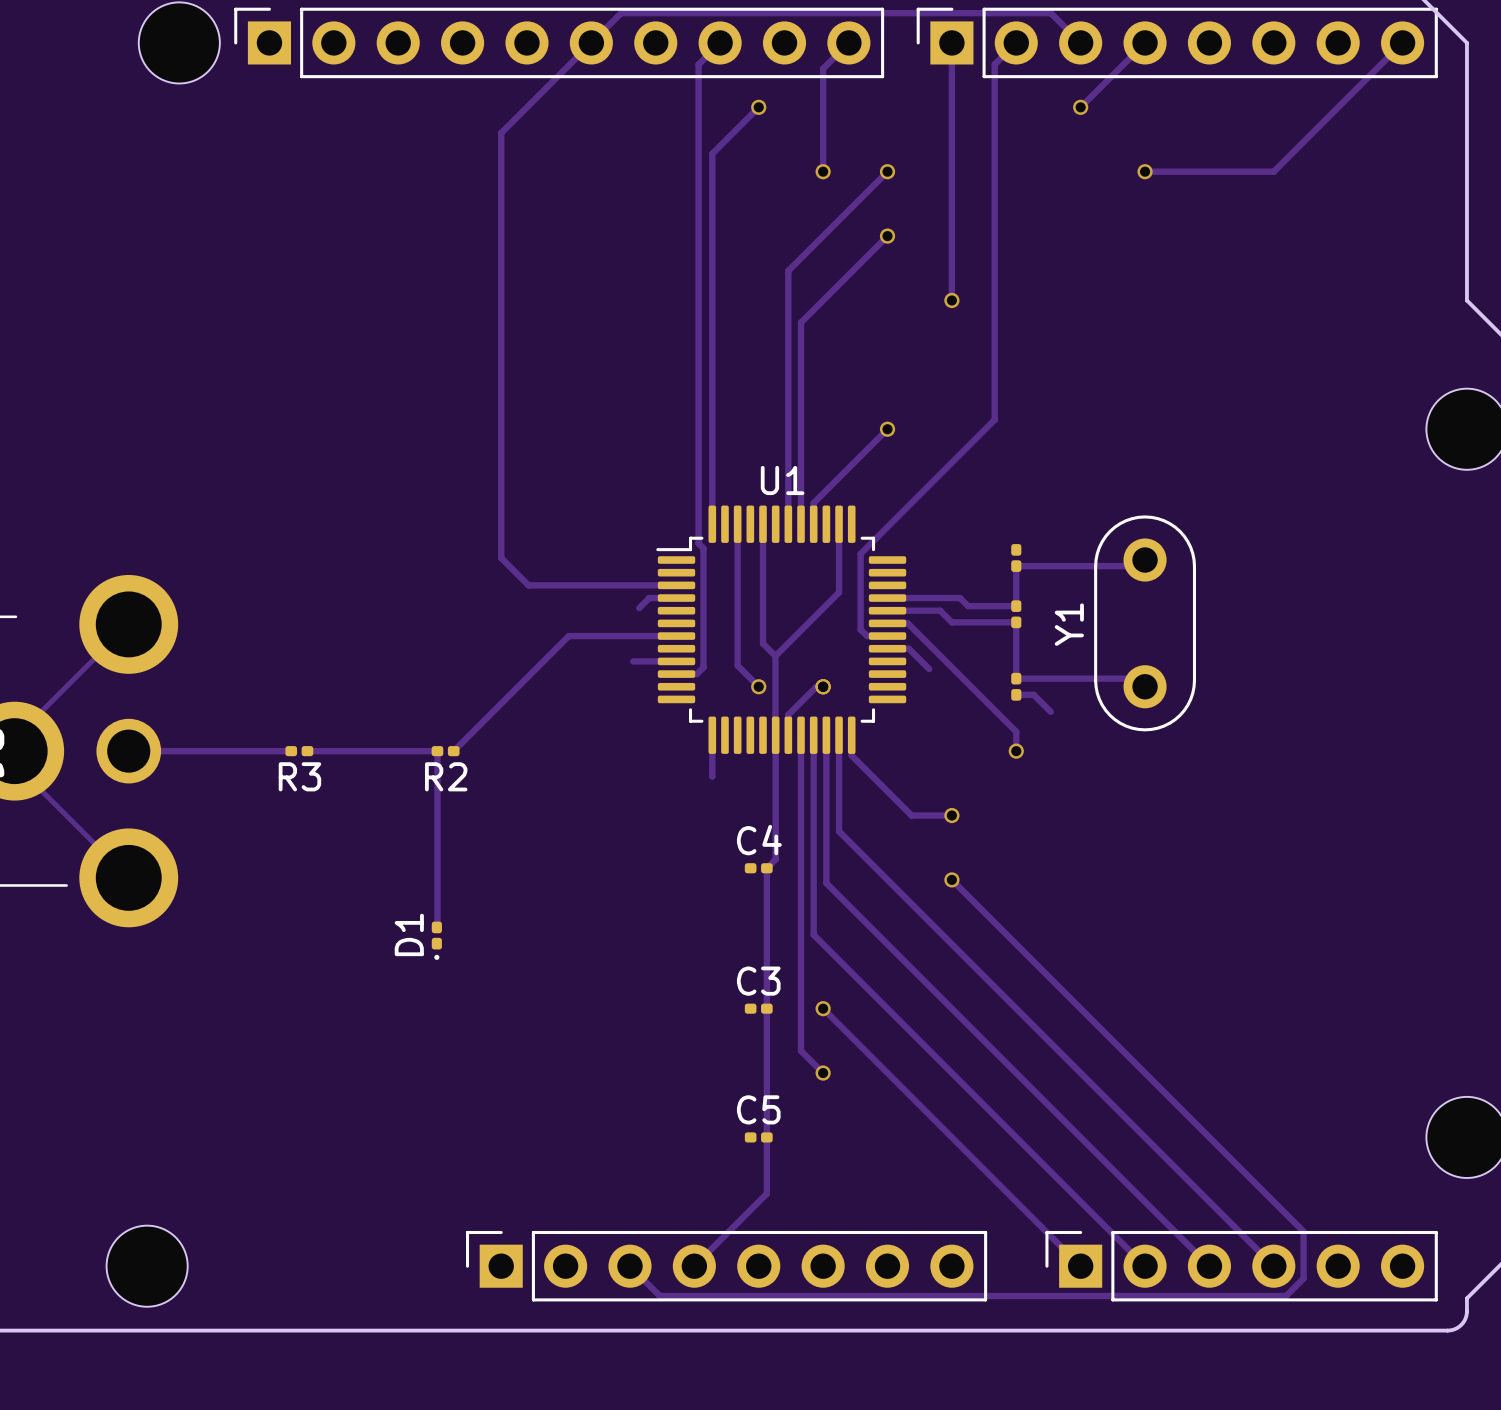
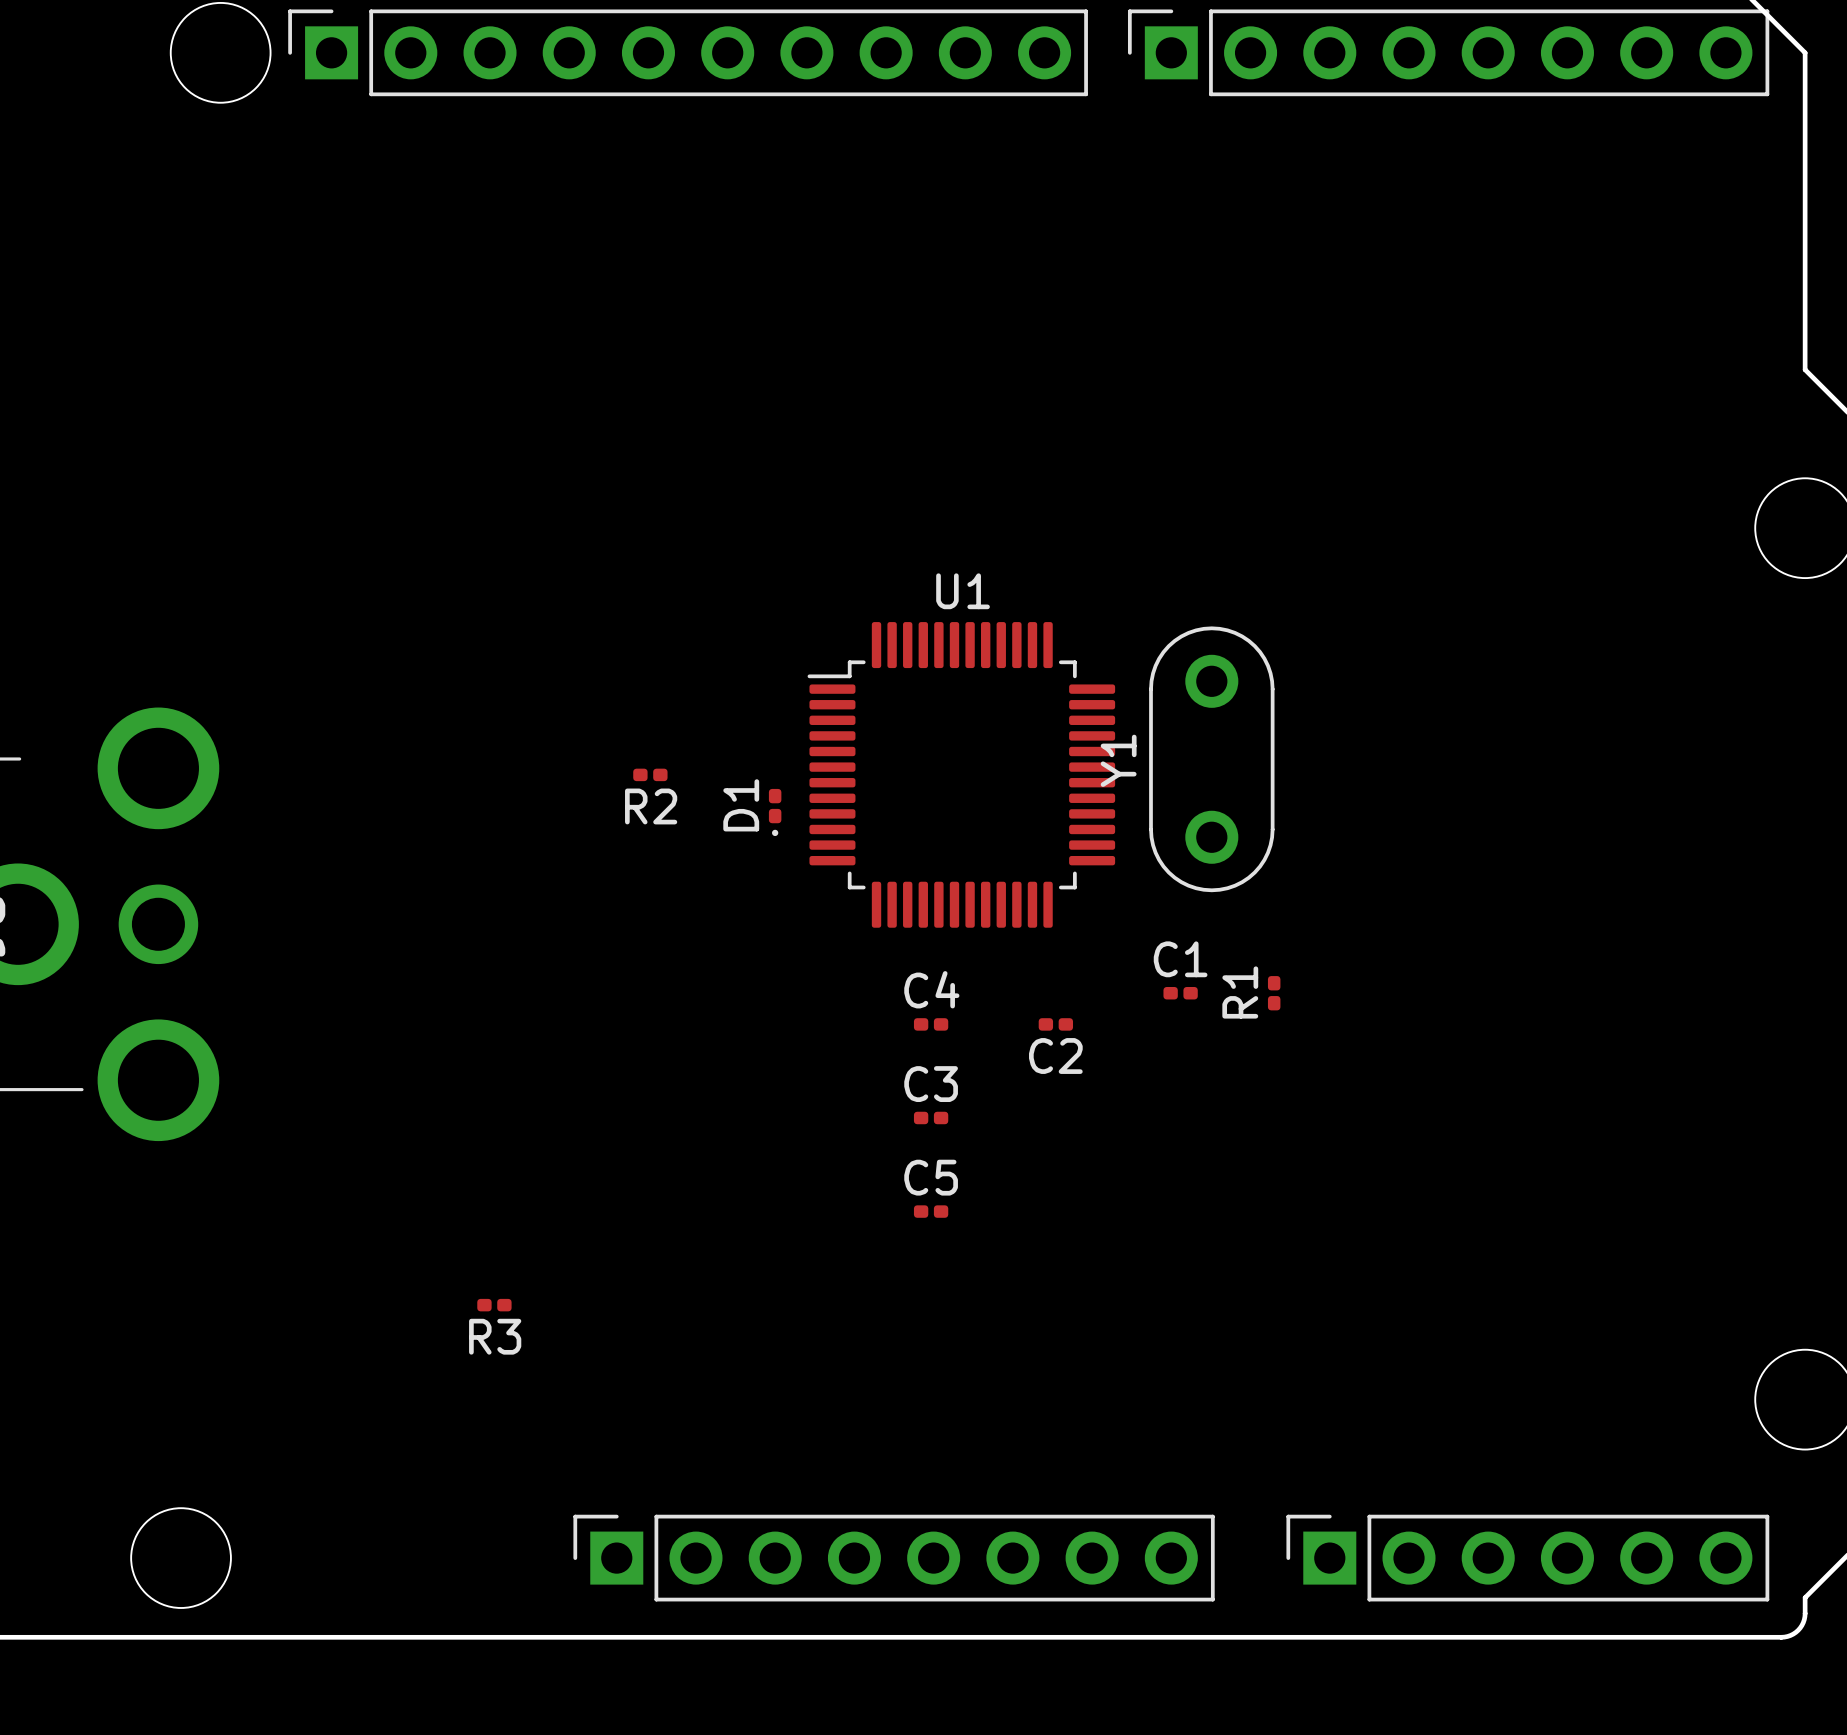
track: (720, 42) (698, 64) (698, 543) (703, 548) (703, 667) (696, 674) (676, 674) -> none
track: (848, 42) (823, 68) (823, 171) -> none
track: (951, 42) (951, 300) -> none
track: (1016, 42) (994, 64) (994, 419) (860, 553) (860, 629) (867, 636) (887, 636) -> none
track: (1080, 42) (1050, 13) (621, 13) (501, 133) (501, 557) (528, 585) (676, 585) -> none
track: (1145, 42) (1080, 107) -> none
track: (1402, 42) (1273, 171) (1145, 171) -> none
track: (758, 107) (712, 153) (712, 524) -> none
via: (758, 107) -> none
via: (1080, 107) -> none
via: (823, 171) -> none
track: (887, 171) (788, 270) (788, 524) -> none
via: (887, 171) -> none
via: (1145, 171) -> none
track: (887, 236) (801, 322) (801, 524) -> none
via: (887, 236) -> none
via: (951, 300) -> none
track: (887, 429) (813, 503) (813, 524) -> none
via: (887, 429) -> none
track: (737, 524) (737, 665) (758, 686) -> none
track: (763, 524) (763, 643) (775, 656) -> none
track: (839, 524) (839, 592) (775, 656) -> none
part: (1016, 557) -> none
track: (1145, 560) (1138, 566) (1016, 566) (1016, 606) (968, 606) (960, 598) (887, 598) -> none
track: (676, 598) (649, 598) (639, 608) -> none
track: (887, 610) (940, 610) (951, 622) (1016, 622) (1016, 678) (1136, 678) (1145, 686) -> none
part: (1016, 614) -> none
track: (887, 623) (907, 623) (1016, 731) (1016, 751) -> none
Y1 position: (1145, 623) -> (1211, 759)
track: (128, 624) (21, 731) (21, 743) -> none
track: (676, 636) (568, 636) (453, 751) -> none
track: (887, 648) (908, 648) (929, 669) -> none
track: (775, 656) (775, 734) -> none
track: (633, 661) (676, 661) -> none
via: (758, 686) -> none
track: (823, 686) (816, 686) (788, 714) (788, 735) -> none
via: (823, 686) -> none
part: (1016, 686) -> none
track: (1016, 694) (1033, 694) (1050, 711) -> none
track: (712, 735) (712, 776) -> none
track: (775, 735) (775, 859) (766, 868) (766, 1193) (694, 1266) -> none
track: (801, 735) (801, 1050) (823, 1073) -> none
track: (813, 735) (813, 934) (1145, 1266) -> none
track: (826, 735) (826, 883) (1209, 1266) -> none
track: (839, 735) (839, 831) (1273, 1266) -> none
track: (851, 735) (851, 755) (911, 815) (951, 815) -> none
track: (14, 751) (14, 763) (128, 877) -> none
track: (128, 751) (291, 751) -> none
R3 position: (299, 751) -> (494, 1305)
track: (307, 751) (437, 751) (436, 927) -> none
R2 position: (445, 751) -> (650, 774)
via: (1016, 751) -> none
C1: none -> (1180, 993)
R1: none -> (1274, 993)
via: (951, 815) -> none
C2: none -> (1055, 1024)
C4 position: (758, 868) -> (931, 1024)
track: (951, 879) (1303, 1231) (1303, 1278) (1286, 1295) (659, 1295) (629, 1266) -> none
via: (951, 879) -> none
D1 position: (436, 940) -> (775, 812)
C3 position: (758, 1008) -> (931, 1117)
track: (823, 1008) (1080, 1266) -> none
via: (823, 1008) -> none
via: (823, 1073) -> none
C5 position: (758, 1137) -> (931, 1211)

